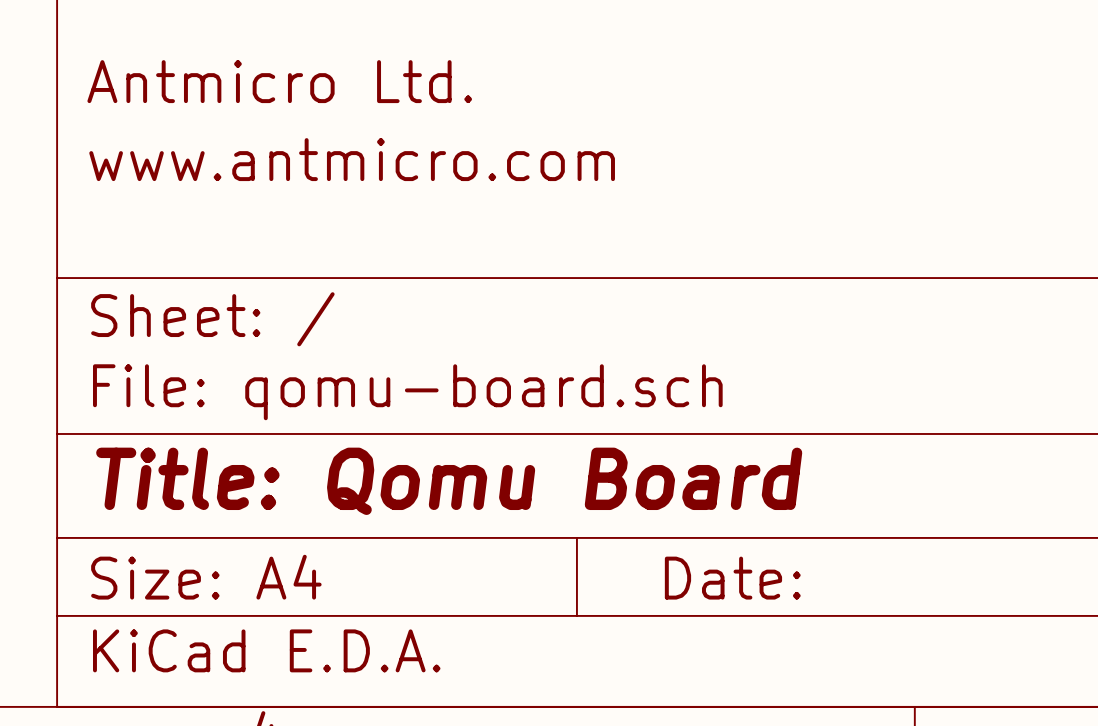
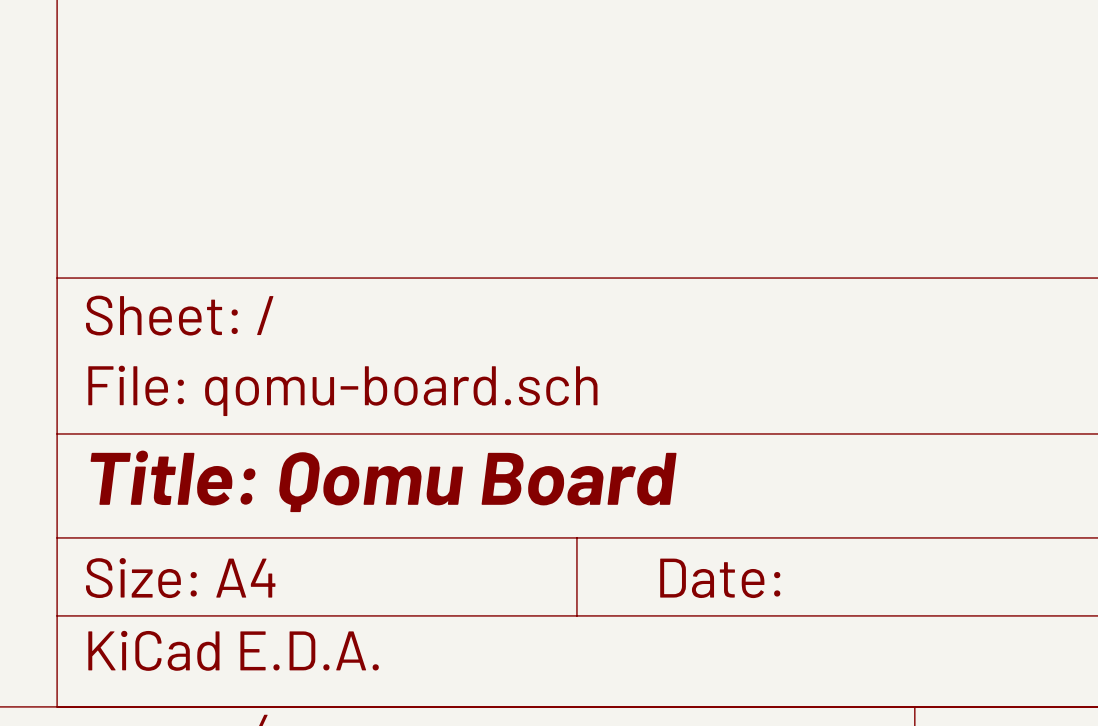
title block: Antmicro Ltd. (279, 81) -> none
title block: www.antmicro.com (352, 159) -> none

